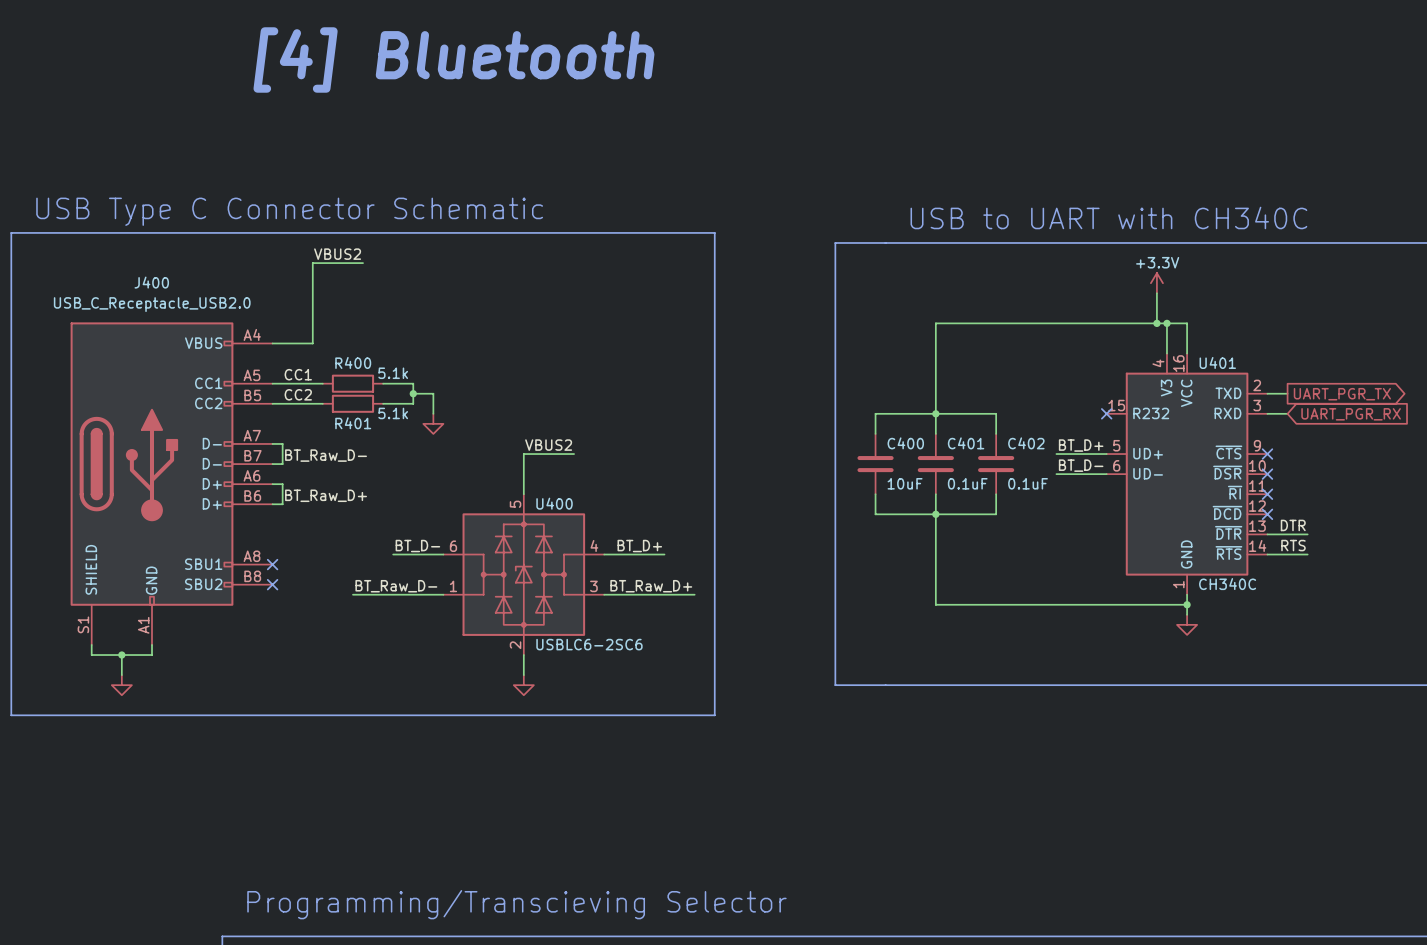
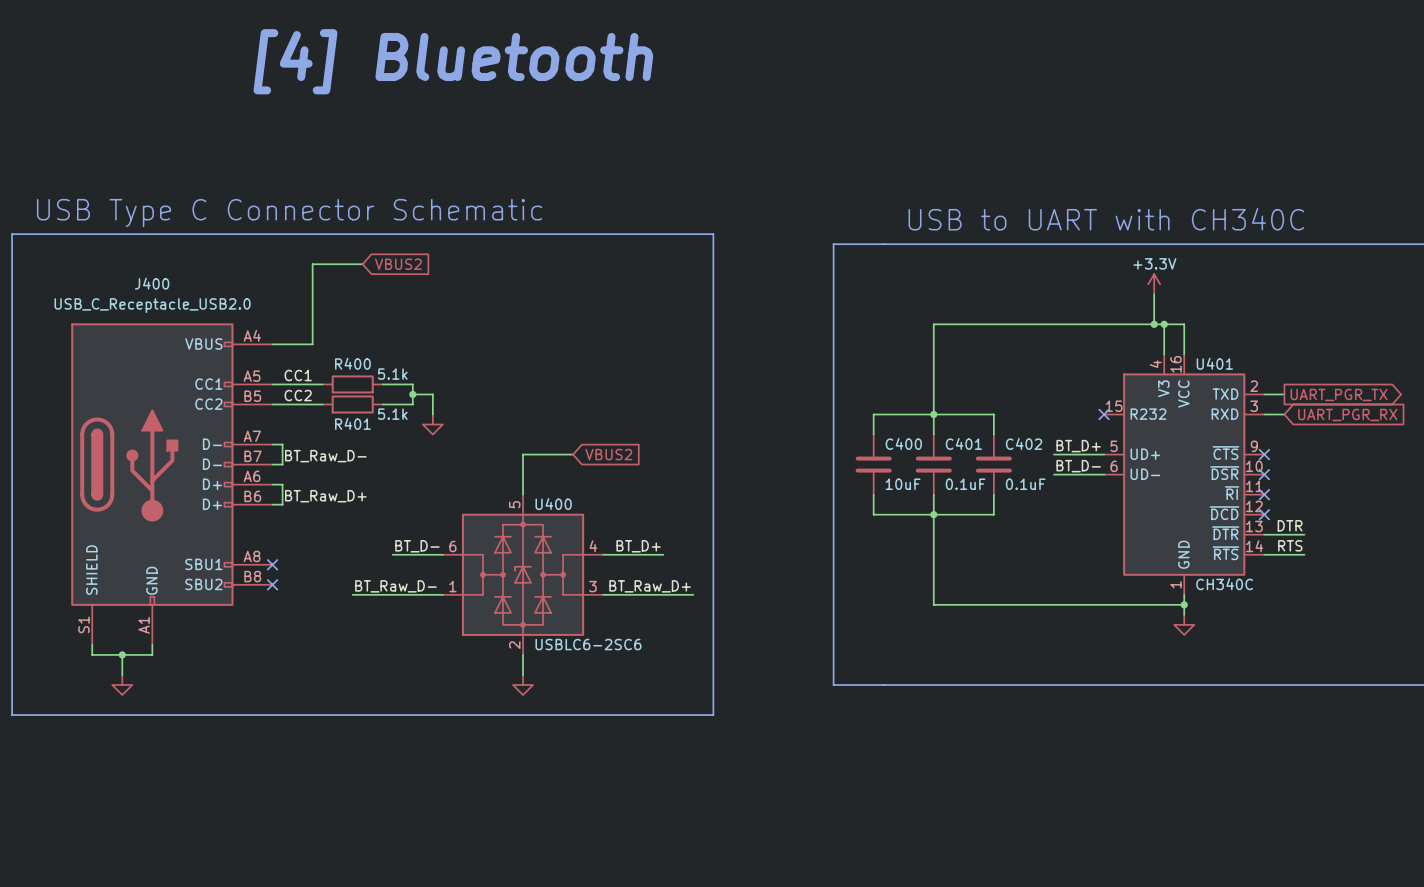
label: VBUS2 (337, 254) -> none
global label: none -> VBUS2 (398, 264)
label: VBUS2 (548, 445) -> none
global label: none -> VBUS2 (608, 454)

